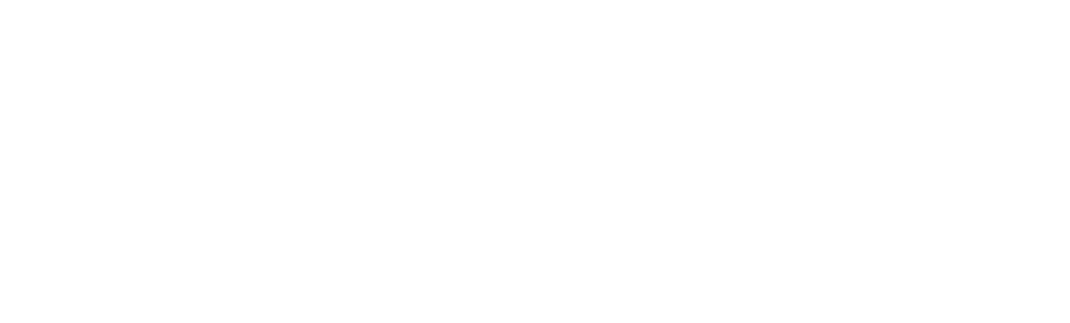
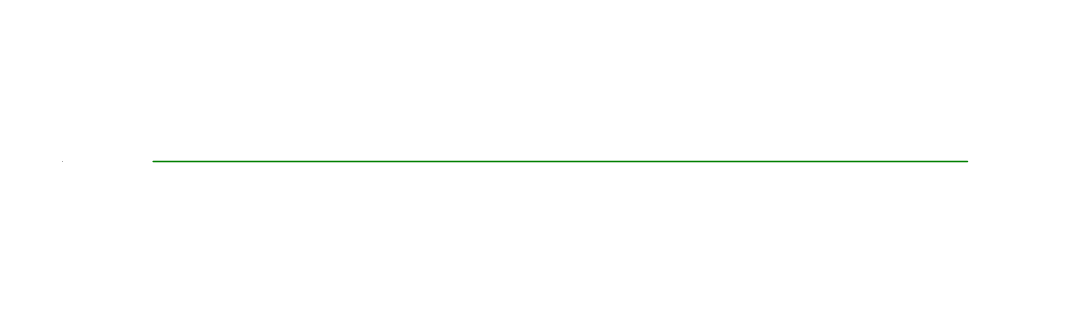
wire: none -> (153, 161) (967, 161)

